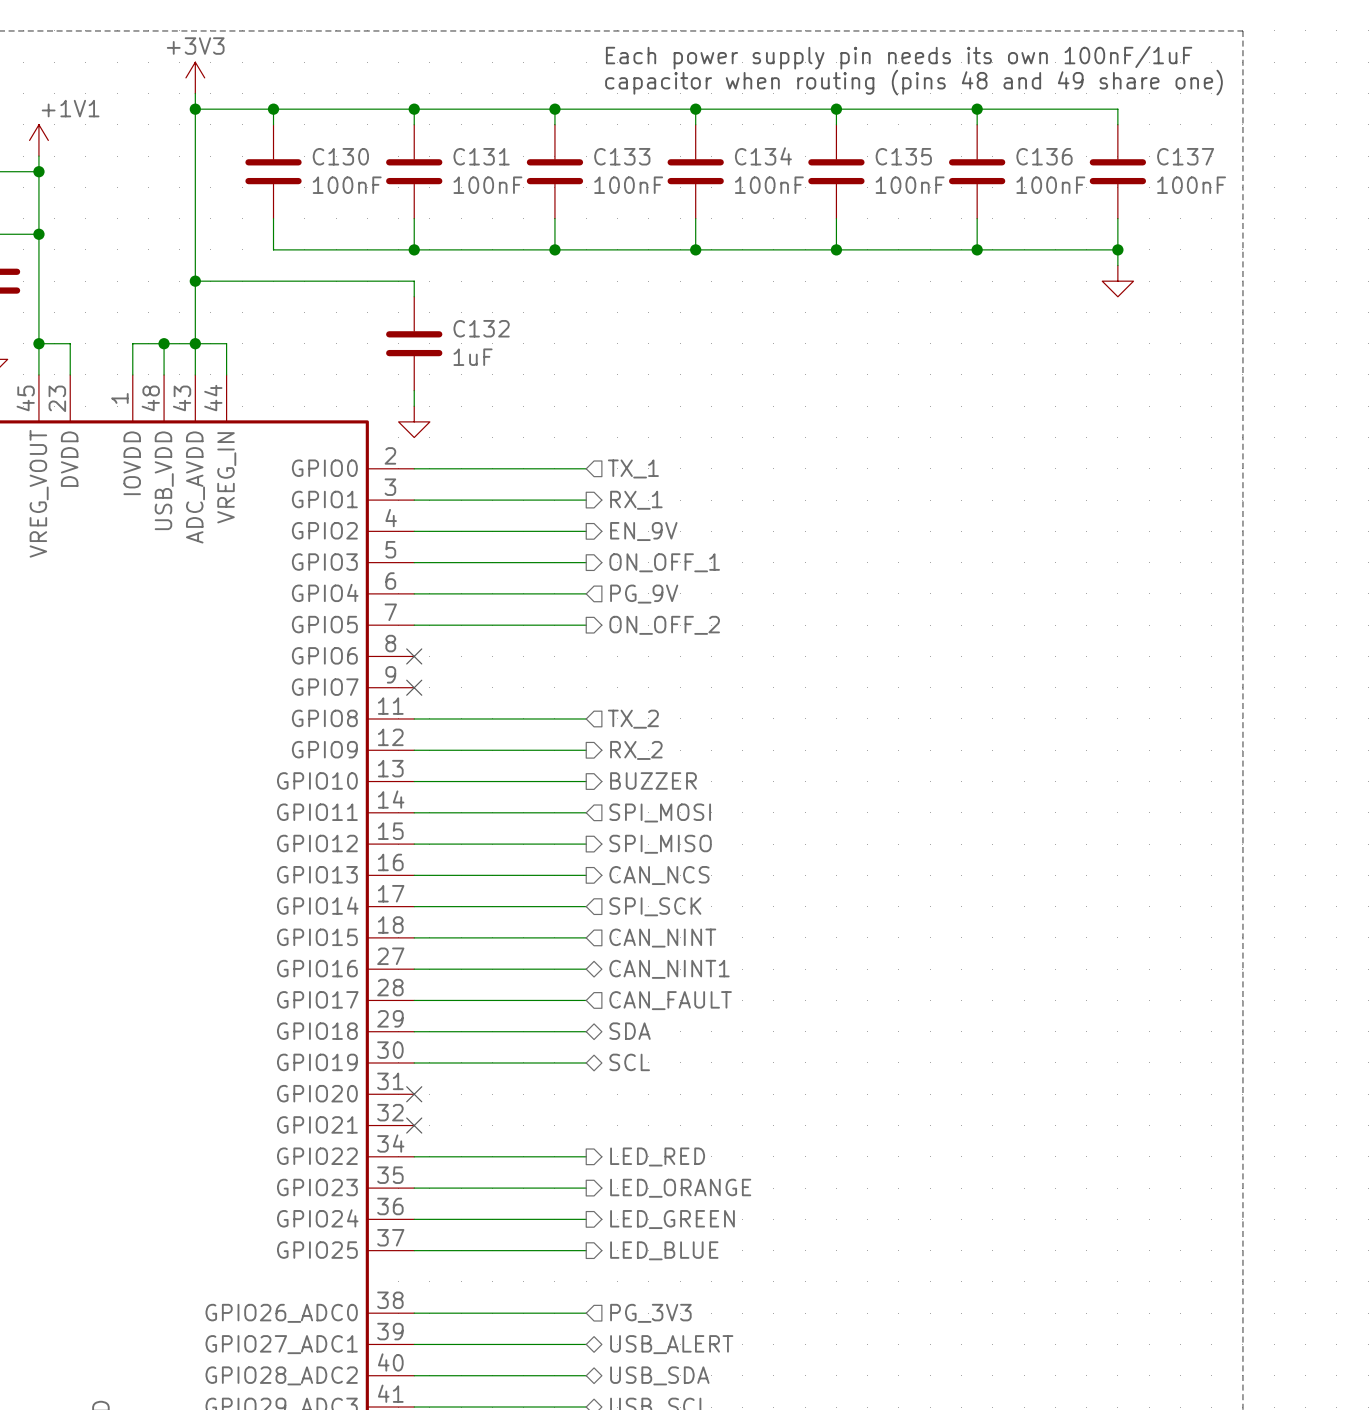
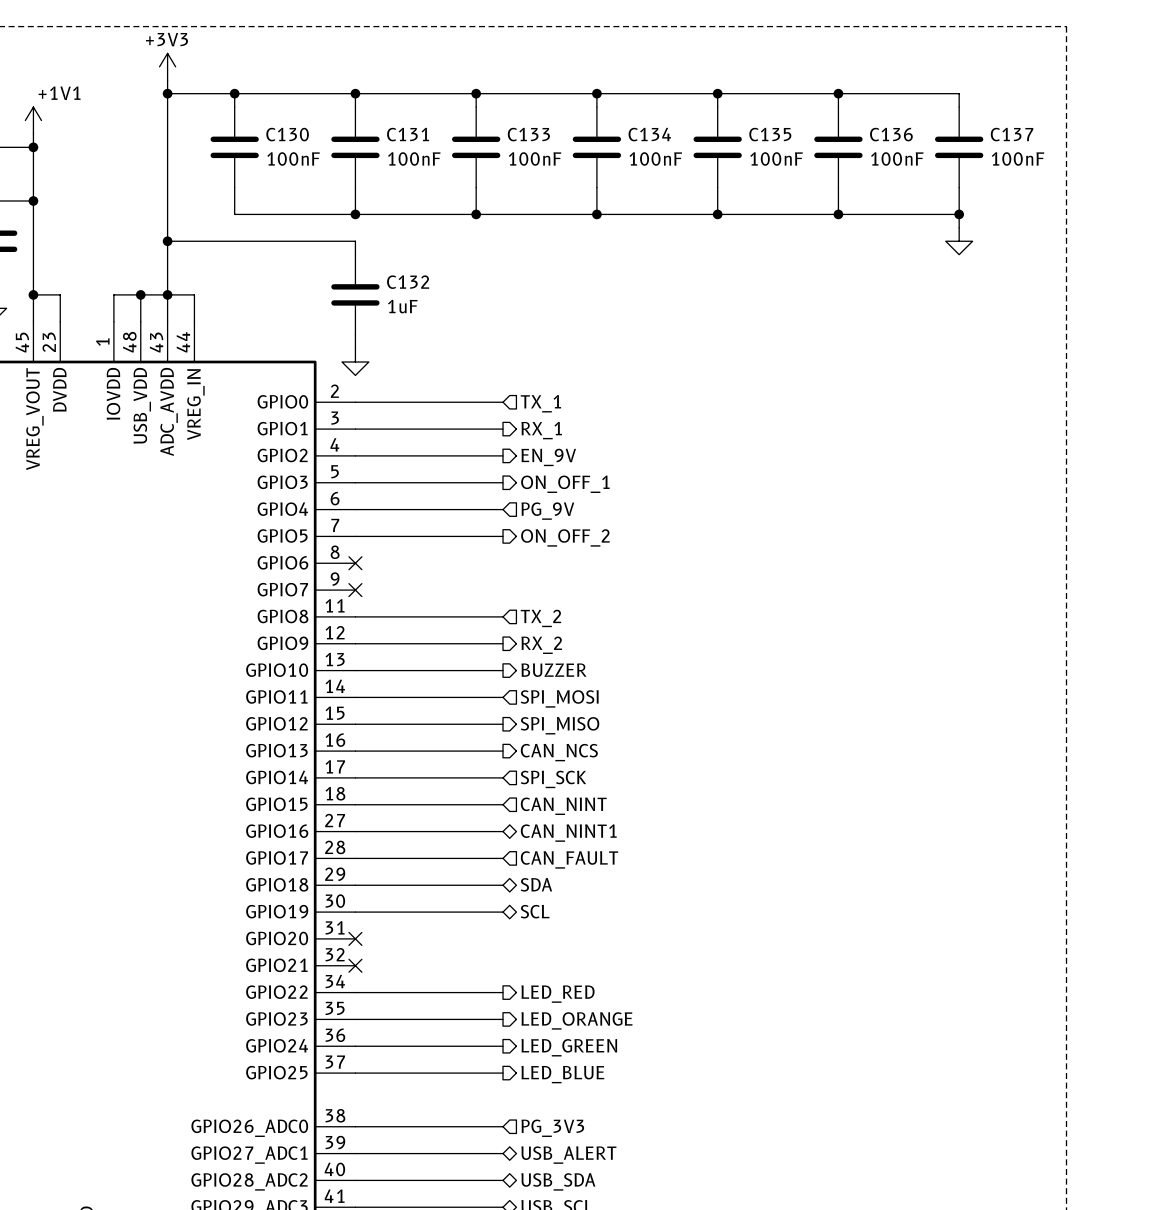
text: Each power supply pin needs its own 100nF/1uF (899, 57) -> none
text: capacitor when routing (pins 48 and 49 share one) (913, 82) -> none

